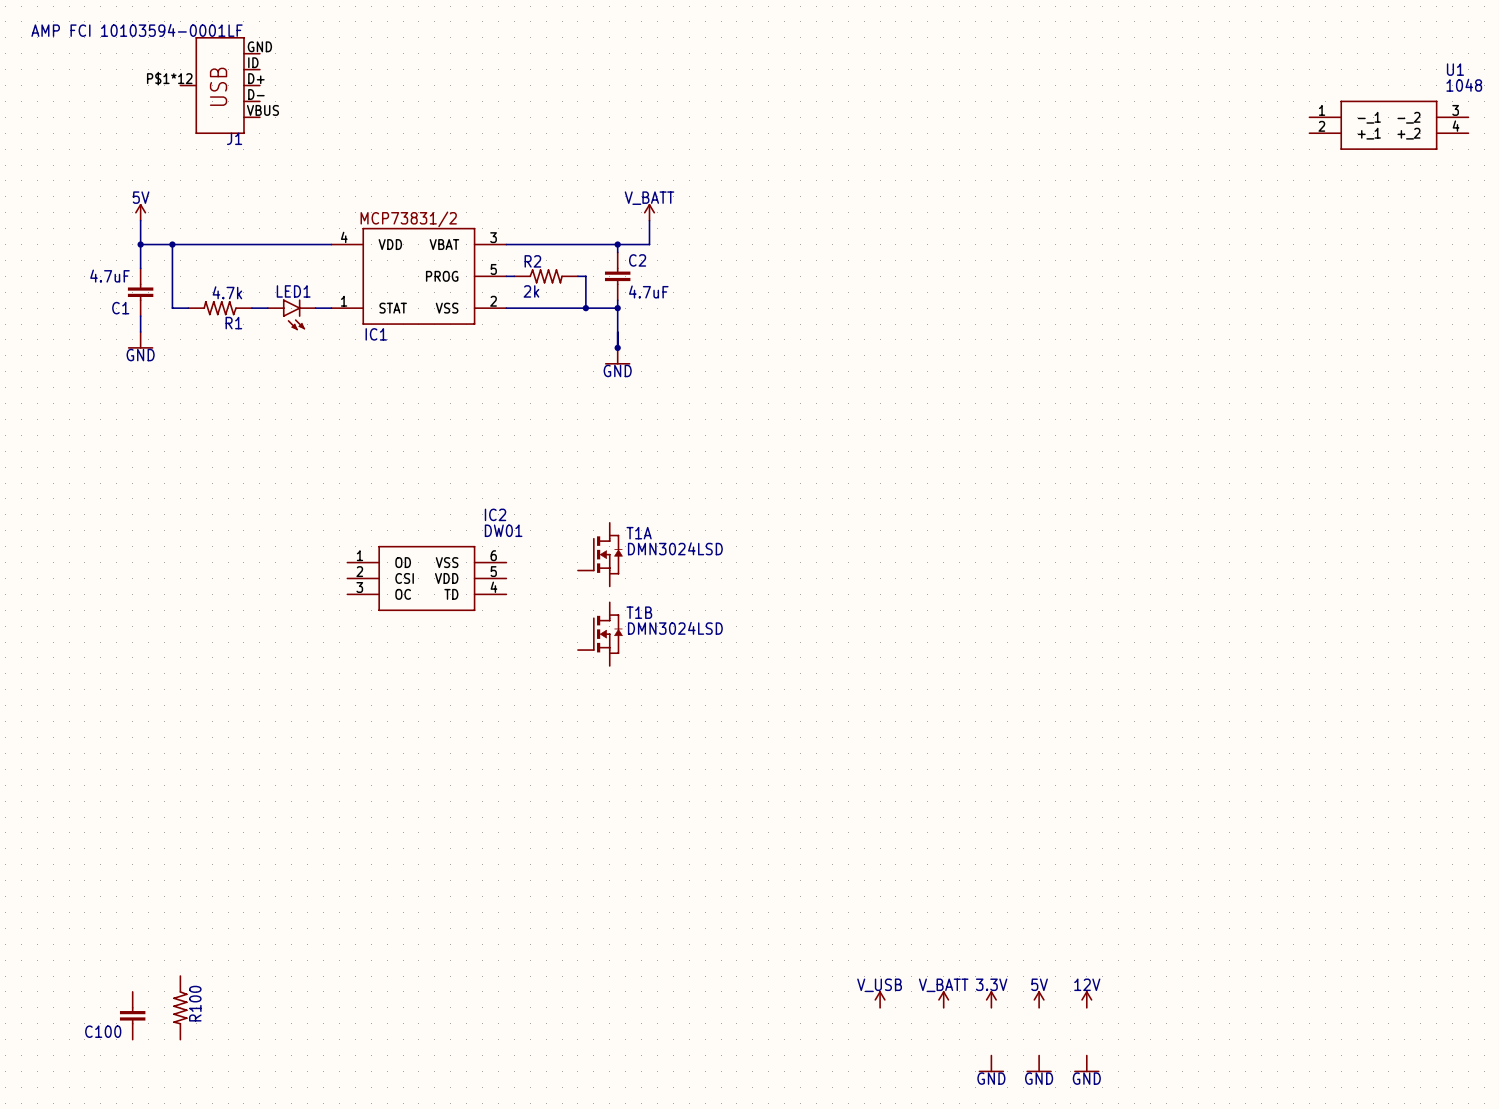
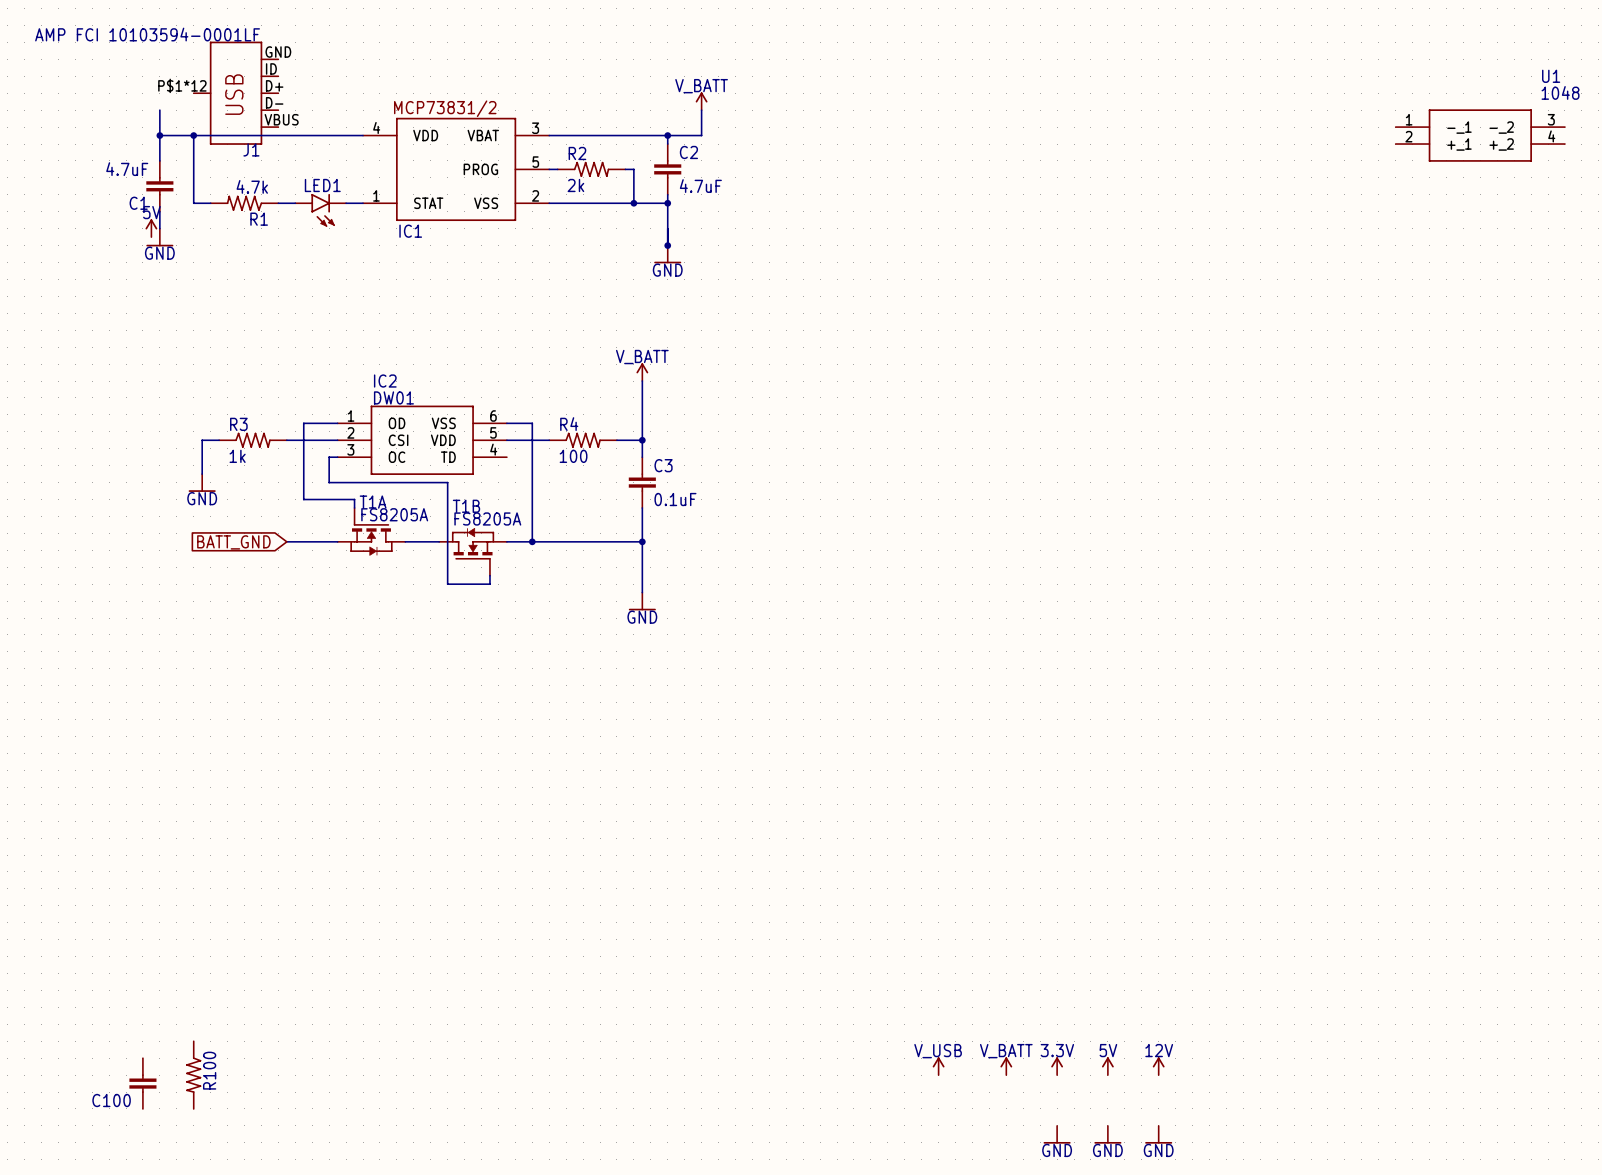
power symbol: none -> V_BATT (701, 101)
junction: none -> (159, 135)
junction: none -> (193, 135)
junction: none -> (667, 135)
junction: none -> (633, 203)
junction: none -> (667, 203)
power symbol: V_BATT (649, 212) -> none
wire: (140, 220) (140, 268) -> (159, 110) (159, 160)
wire: (649, 220) (649, 244) (506, 244) -> (701, 110) (701, 135) (549, 135)
power symbol: none -> GND (159, 237)
power symbol: none -> GND (667, 254)
wire: (140, 244) (331, 244) -> (159, 135) (363, 135)
junction: (140, 244) -> none
wire: (172, 244) (172, 308) (188, 308) -> (193, 135) (193, 203) (210, 203)
junction: (172, 244) -> none
junction position: (617, 244) -> (667, 245)
IC1 position: (418, 276) -> (456, 169)
wire: (506, 276) (514, 276) -> (549, 169) (557, 169)
R2 position: (546, 276) -> (591, 169)
wire: (577, 276) (585, 276) (585, 308) -> (625, 169) (633, 169) (633, 203)
C2 position: (617, 276) -> (667, 169)
C1 position: (140, 292) -> (159, 186)
wire: (617, 300) (617, 347) -> (667, 194) (667, 245)
R1 position: (220, 308) -> (244, 203)
wire: (251, 308) (267, 308) -> (278, 203) (295, 203)
wire: (315, 308) (331, 308) -> (346, 203) (363, 203)
wire: (506, 308) (617, 308) -> (549, 203) (667, 203)
junction: (585, 308) -> none
junction: (617, 308) -> none
LED1 position: (291, 314) -> (320, 210)
wire: (140, 316) (140, 331) -> (159, 211) (159, 228)
power symbol: GND (140, 340) -> none
power symbol: none -> V_BATT (642, 372)
junction: (617, 347) -> none
wire: none -> (642, 381) (642, 457)
power symbol: GND (617, 356) -> none
wire: none -> (337, 423) (303, 423) (303, 499) (354, 499) (354, 507)
wire: none -> (506, 423) (532, 423) (532, 541)
wire: none -> (219, 440) (202, 440) (202, 474)
R3: none -> 1k (252, 440)
wire: none -> (286, 440) (337, 440)
wire: none -> (506, 440) (549, 440)
R4: none -> 100 (583, 440)
wire: none -> (616, 440) (642, 440)
junction: none -> (642, 440)
wire: none -> (337, 457) (329, 457) (329, 482) (447, 482) (447, 584) (489, 584) (489, 575)
power symbol: none -> GND (202, 483)
C3: none -> 0.1uF (642, 482)
wire: none -> (642, 507) (642, 592)
wire: none -> (286, 541) (337, 541)
wire: none -> (405, 541) (439, 541)
wire: none -> (506, 541) (642, 541)
junction: none -> (532, 541)
junction: none -> (642, 541)
global label: none -> BATT_GND (233, 542)
IC2 name position: IC2 (495, 514) -> IC2 (385, 381)
IC2 value position: DW01 (503, 530) -> DW01 (393, 397)
T1A name position: T1A (639, 533) -> T1A (373, 502)
T1A value: DMN3024LSD (675, 548) -> FS8205A (394, 514)
T1A position: (600, 554) -> (371, 531)
T1A rotation: 0° (608, 554) -> 90° clockwise (371, 540)
power symbol: none -> GND (642, 601)
IC2 position: (426, 578) -> (422, 440)
T1B name position: T1B (639, 612) -> T1B (466, 506)
T1B value: DMN3024LSD (675, 628) -> FS8205A (487, 518)
T1B position: (600, 634) -> (473, 551)
T1B rotation: 0° (608, 634) -> 90° counterclockwise (473, 543)

